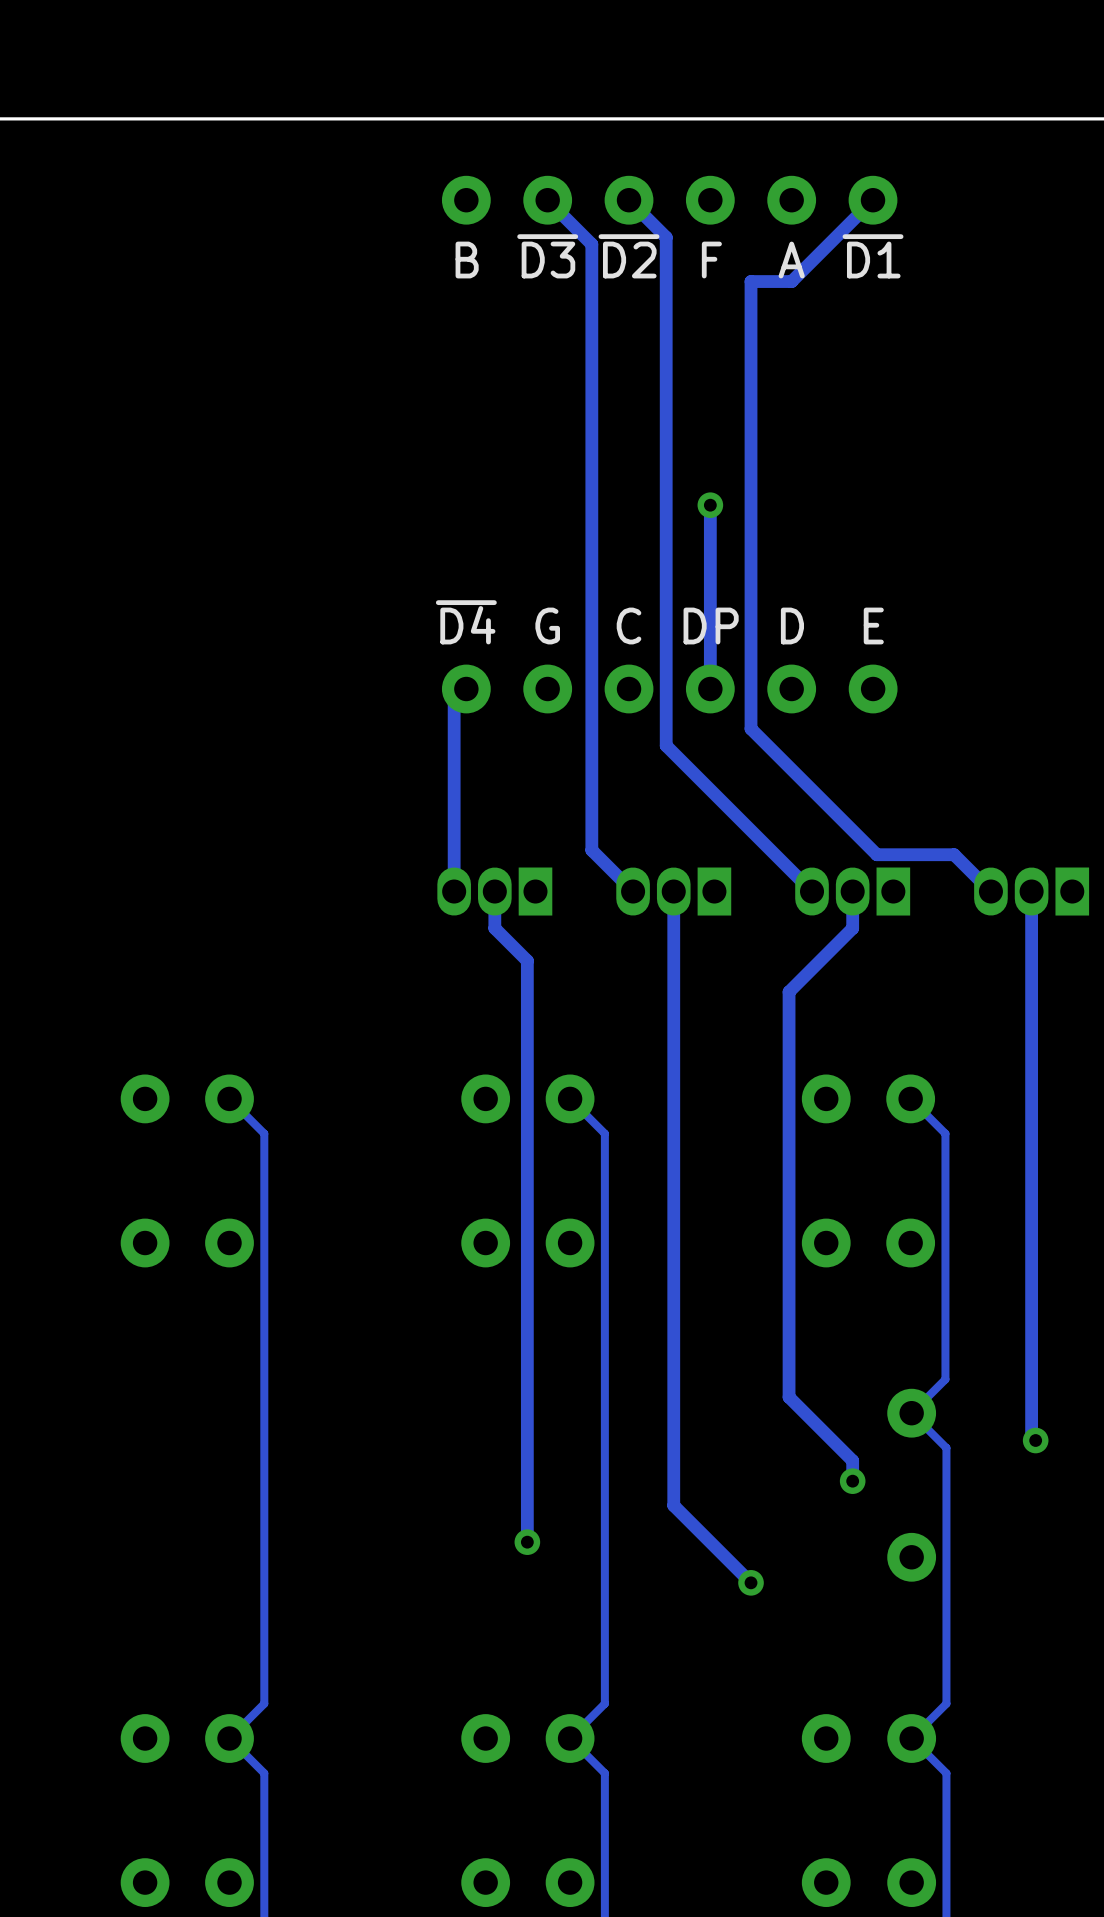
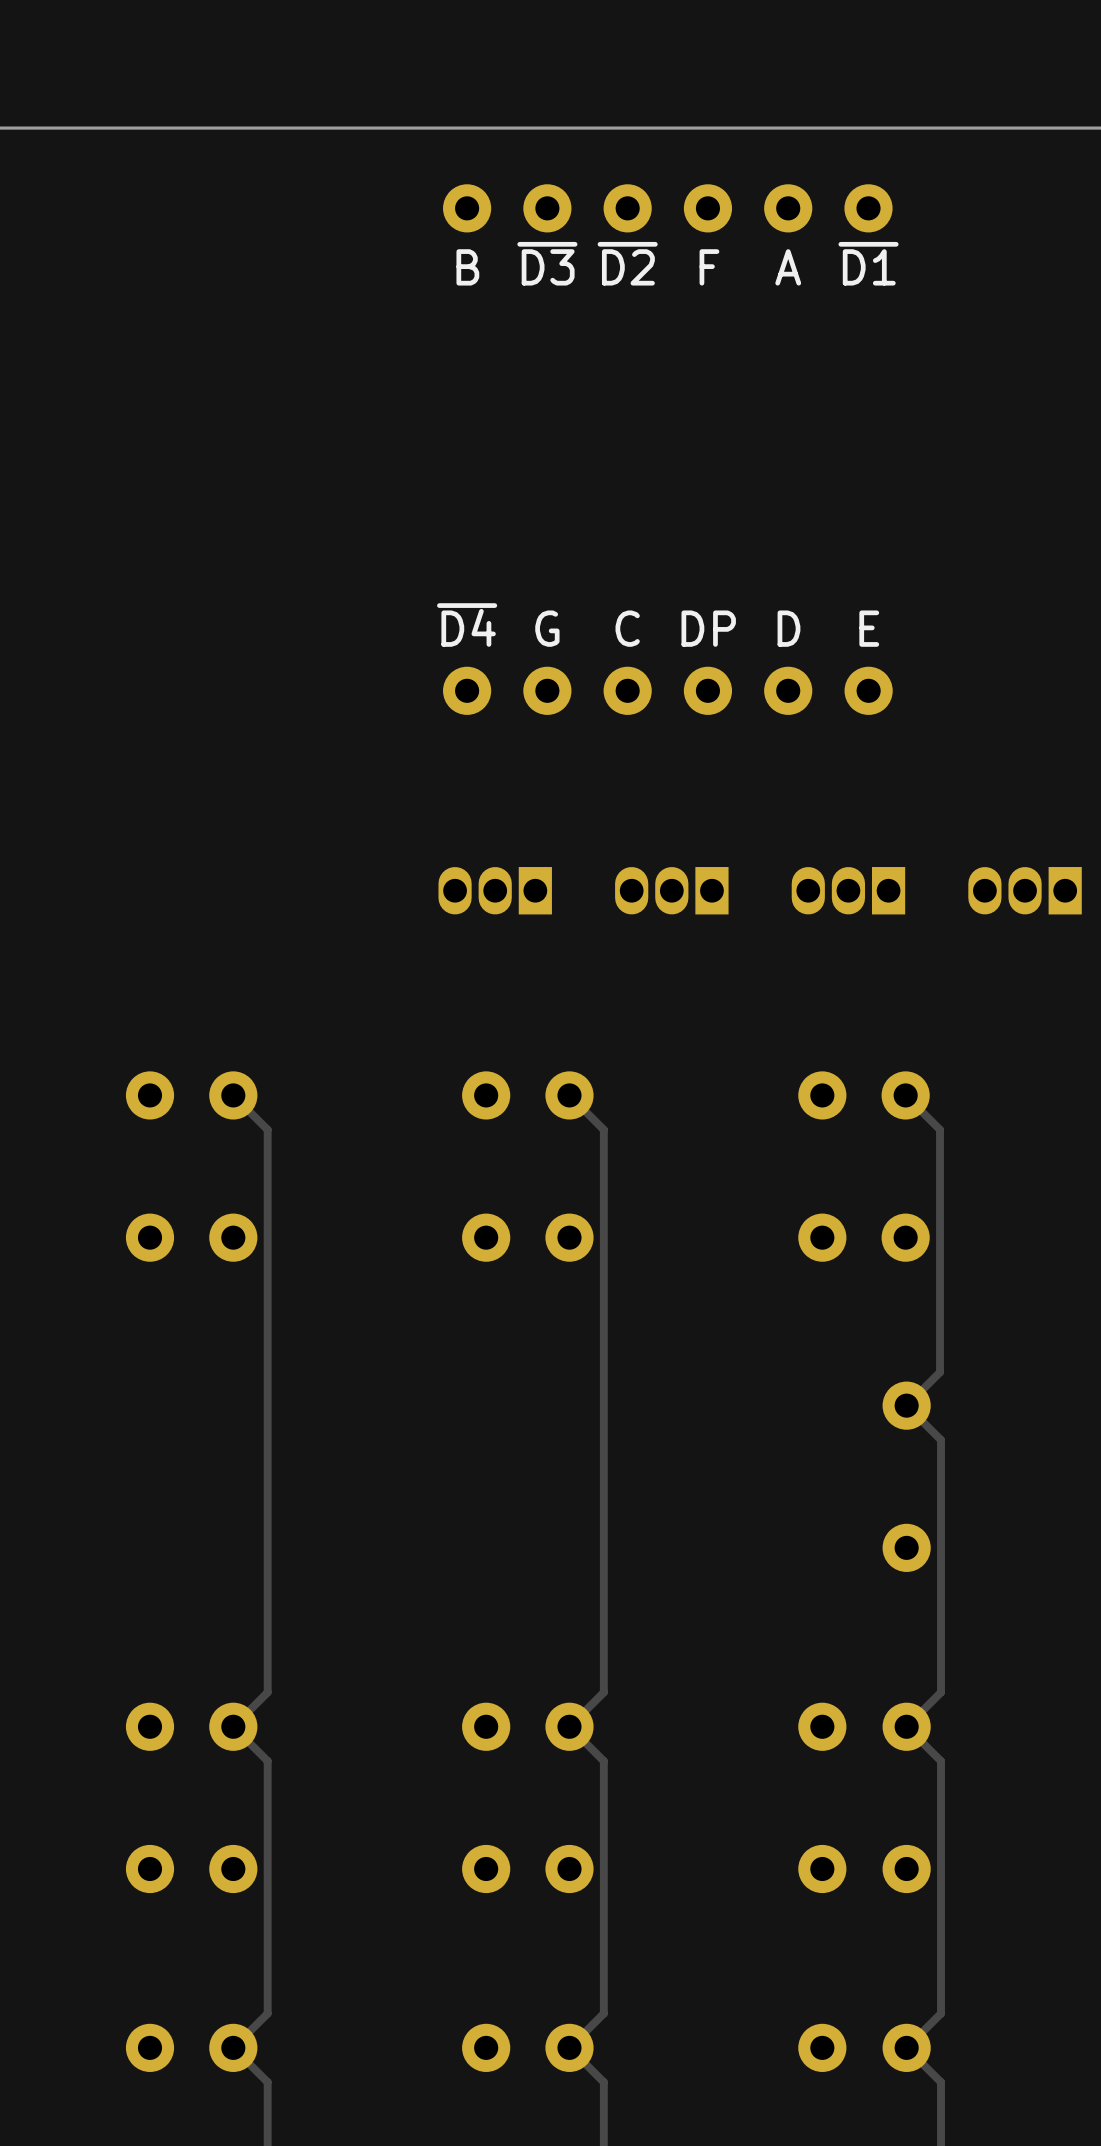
track: (547, 200) (591, 244) (591, 850) (633, 891) -> none
track: (629, 200) (666, 237) (666, 745) (812, 891) -> none
track: (873, 200) (791, 281) (751, 281) (751, 728) (876, 854) (954, 854) (990, 891) -> none
track: (710, 505) (710, 688) -> none
via: (710, 505) -> none
track: (466, 688) (454, 701) (454, 891) -> none
track: (494, 891) (494, 928) (527, 960) (527, 1542) -> none
track: (673, 891) (673, 1505) (751, 1582) -> none
track: (852, 891) (852, 928) (789, 991) (789, 1397) (852, 1460) (852, 1481) -> none
track: (1031, 891) (1031, 1436) (1035, 1440) -> none
via: (1035, 1440) -> none
via: (852, 1481) -> none
via: (527, 1542) -> none
via: (751, 1582) -> none

